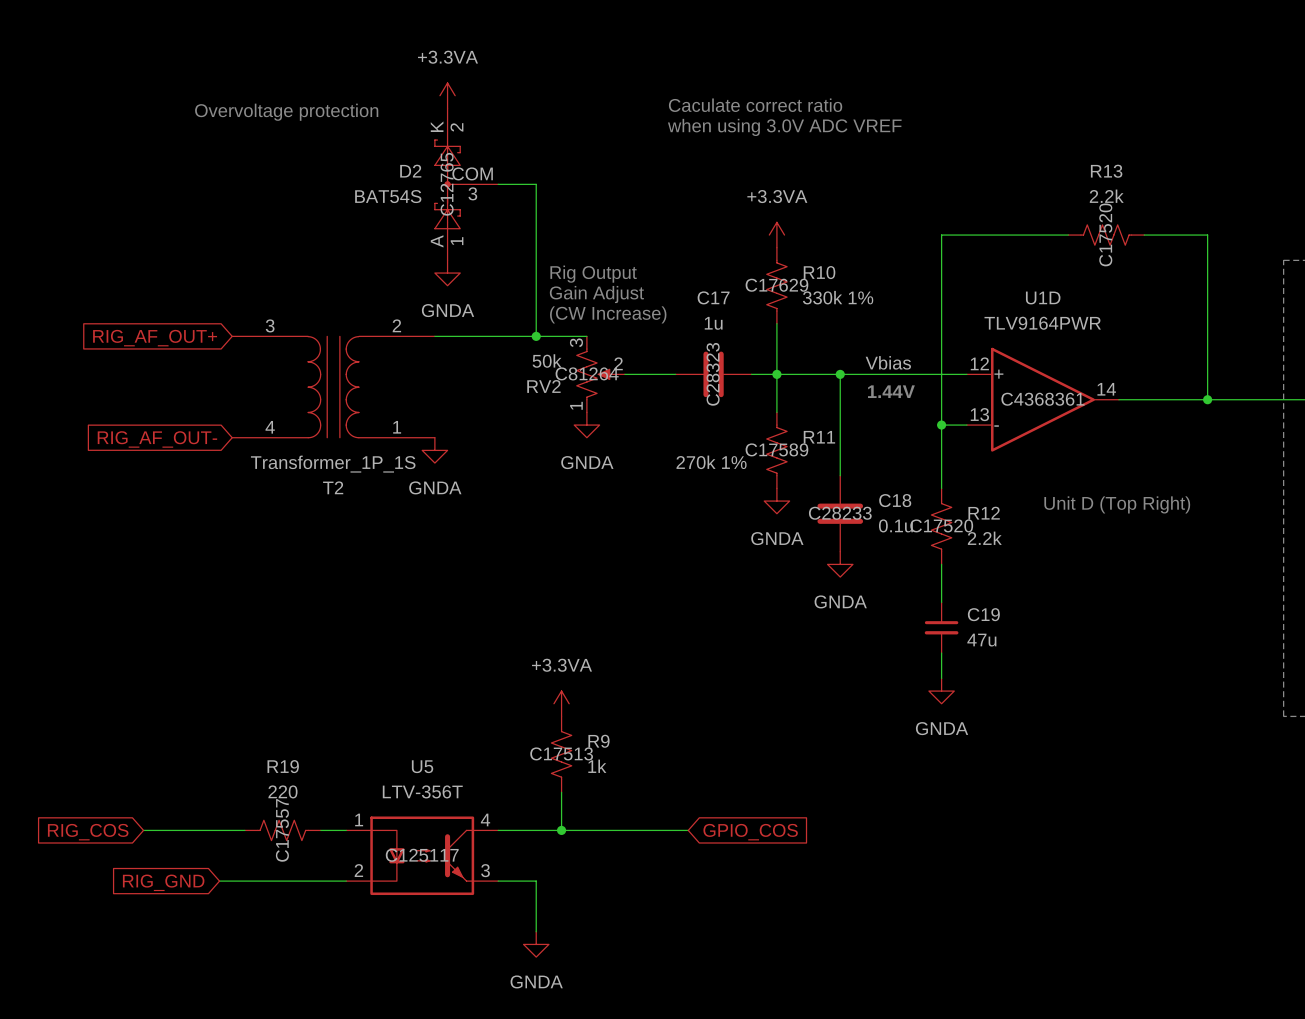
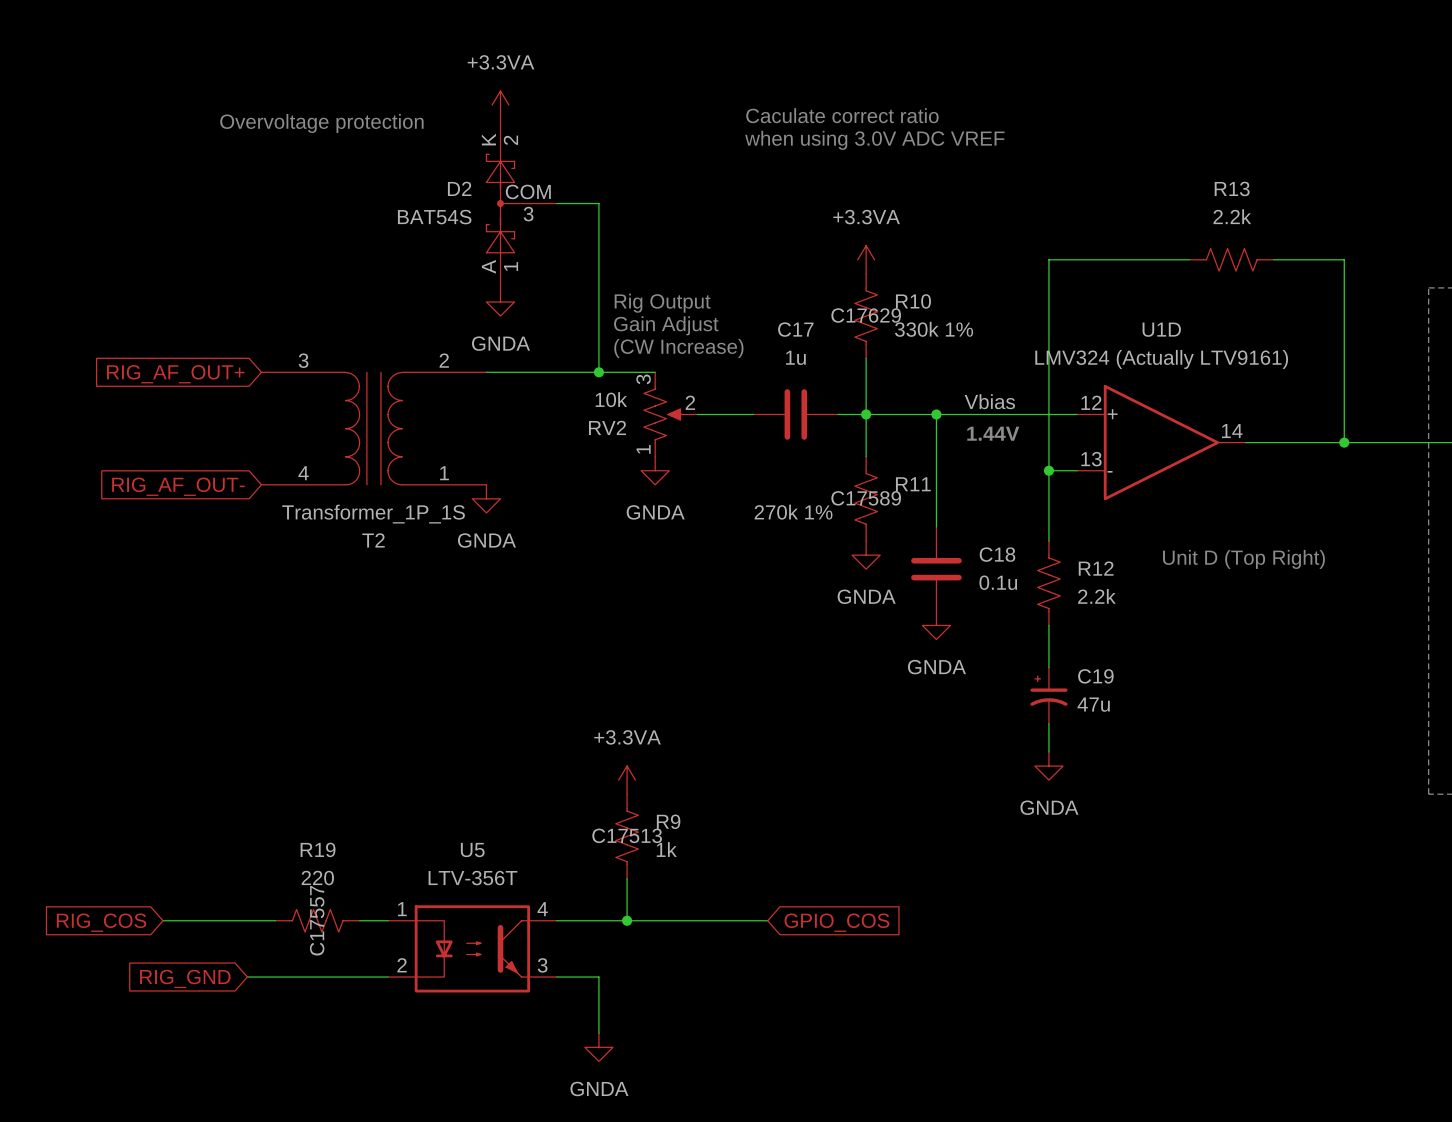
D2 text: C12765 (447, 184) -> none
R13 text: C17520 (1105, 234) -> none
U1D value: TLV9164PWR (1042, 323) -> LMV324 (Actually LTV9161) (1161, 359)
RV2 value: 50k (547, 361) -> 10k (611, 399)
RV2 text: C81264 (587, 373) -> none
C17 text: C28323 (713, 374) -> none
U1D text: C4368361 (1042, 399) -> none
C18 text: C28233 (840, 513) -> none
R12 text: C17520 (941, 525) -> none
C19 symbol: [924, 602, 959, 654] -> [1030, 667, 1068, 724]
U5 text: C125117 (422, 855) -> none

